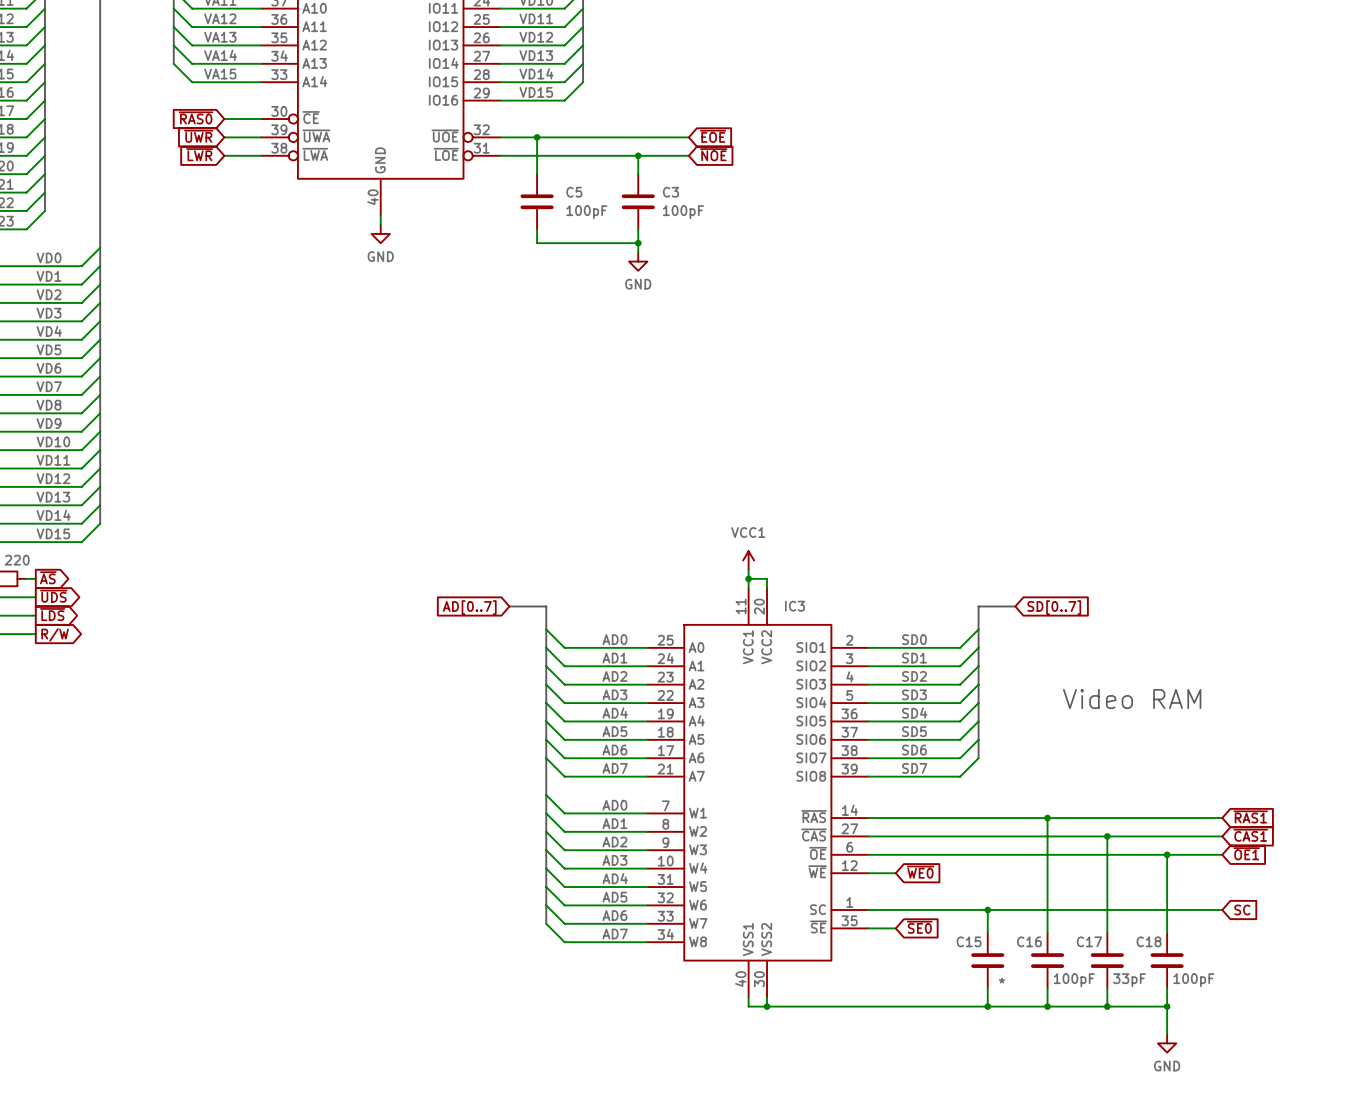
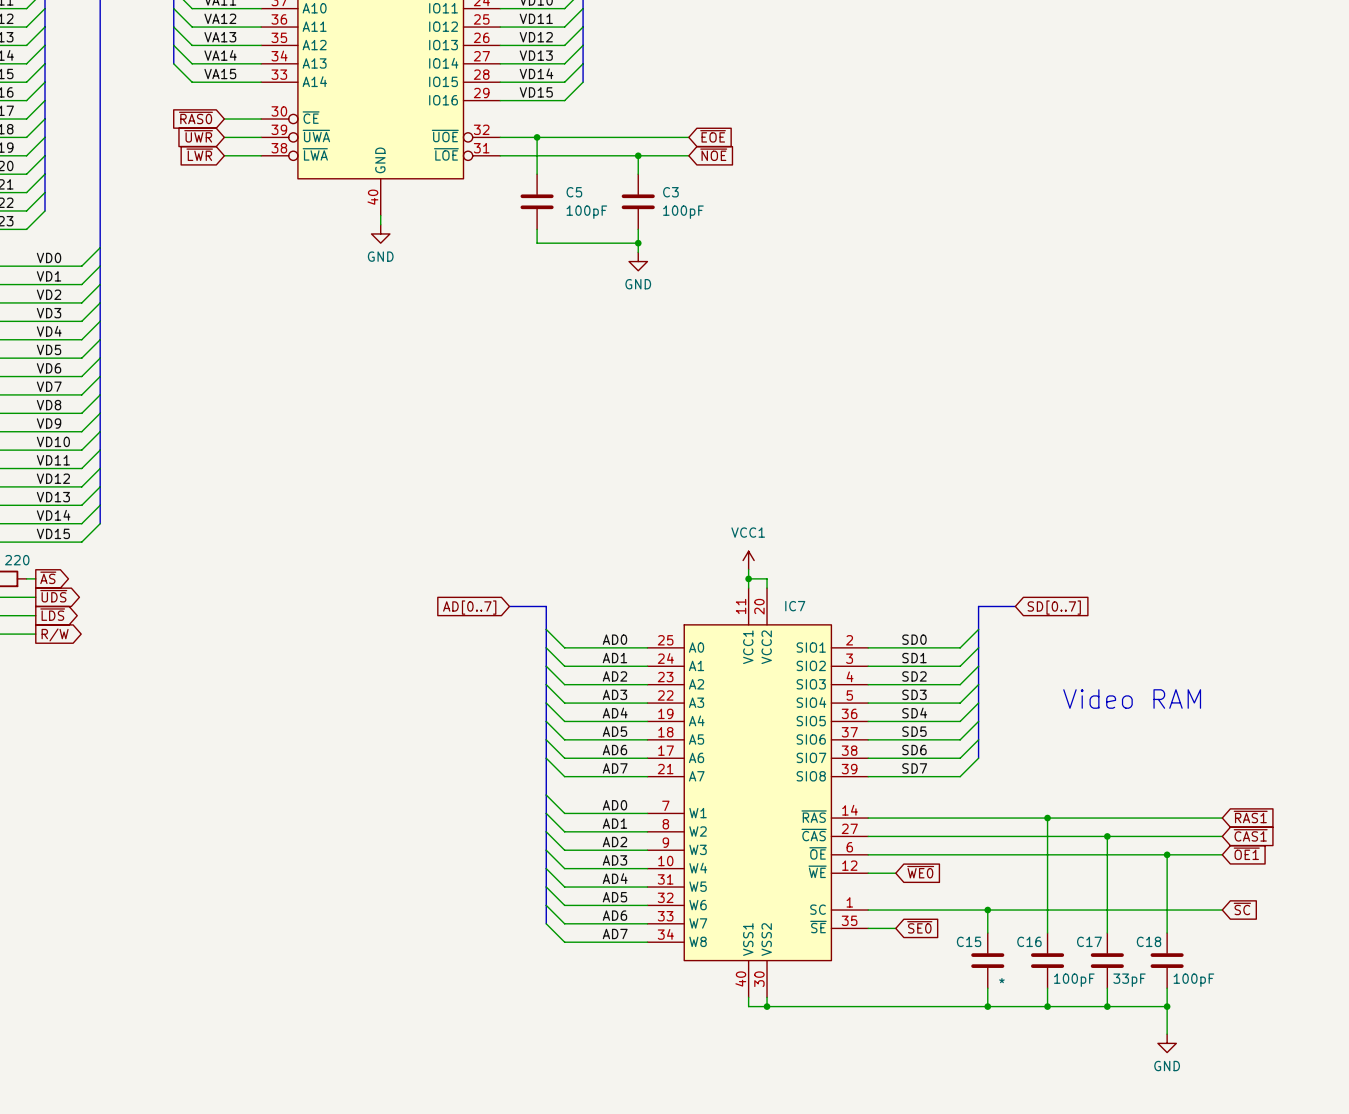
IC3 name: IC3 (795, 606) -> IC7 (795, 606)
global label: SC (1242, 910) -> ~{SC} (1242, 908)

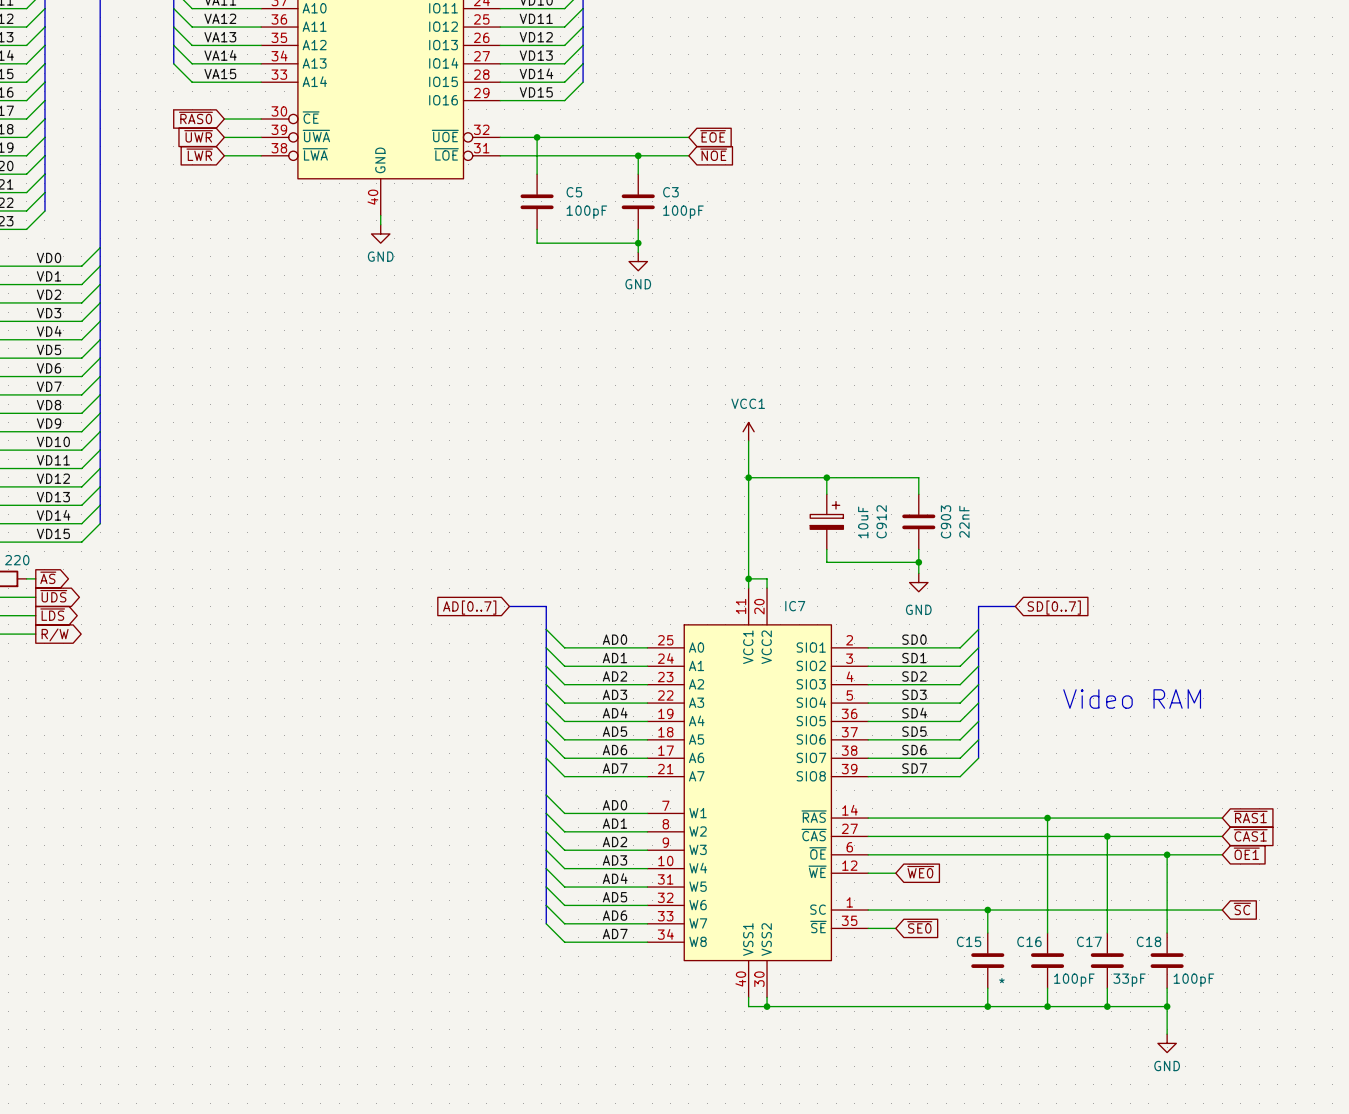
wire: none -> (748, 440) (748, 569)
wire: none -> (748, 477) (918, 477) (918, 494)
junction: none -> (748, 477)
wire: none -> (826, 477) (826, 494)
junction: none -> (826, 477)
C912: none -> 10uF (826, 521)
C903: none -> 22nF (918, 521)
wire: none -> (826, 549) (826, 562) (918, 562)
wire: none -> (918, 549) (918, 573)
power symbol position: VCC1 (748, 560) -> VCC1 (748, 431)
junction: none -> (918, 562)
power symbol: none -> GND (918, 582)

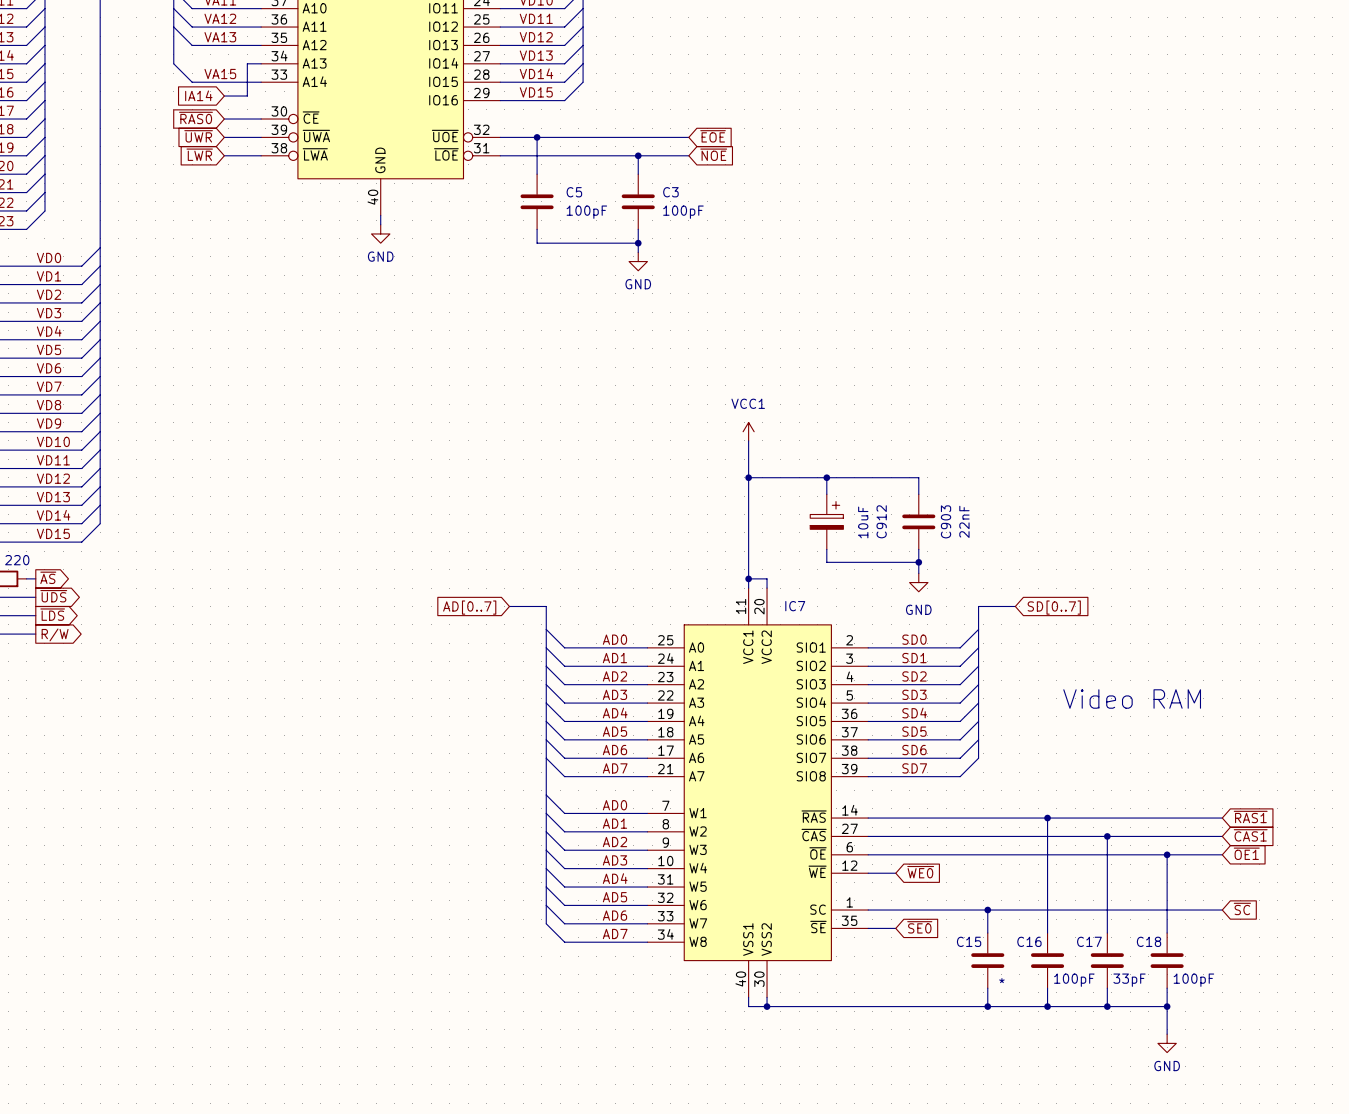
wire: (173, 45) (192, 63) (247, 63) -> (224, 96) (247, 96) (247, 63)
label: VA14 (220, 55) -> none
global label: none -> IA14 (198, 95)

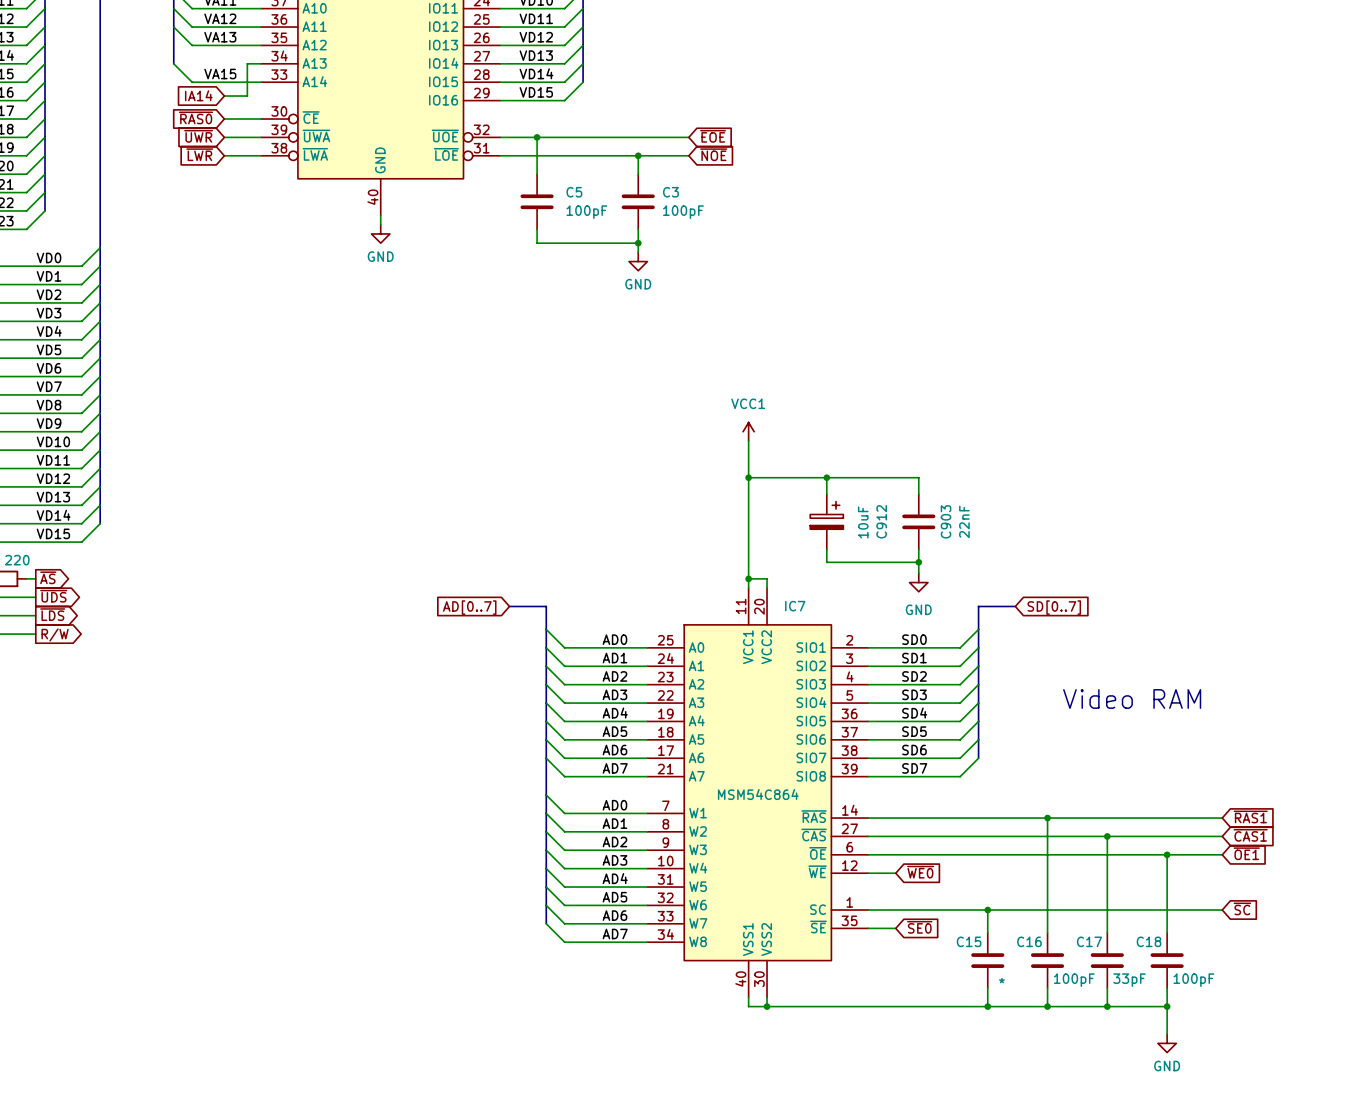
IC7 value: none -> MSM54C864 (758, 794)

